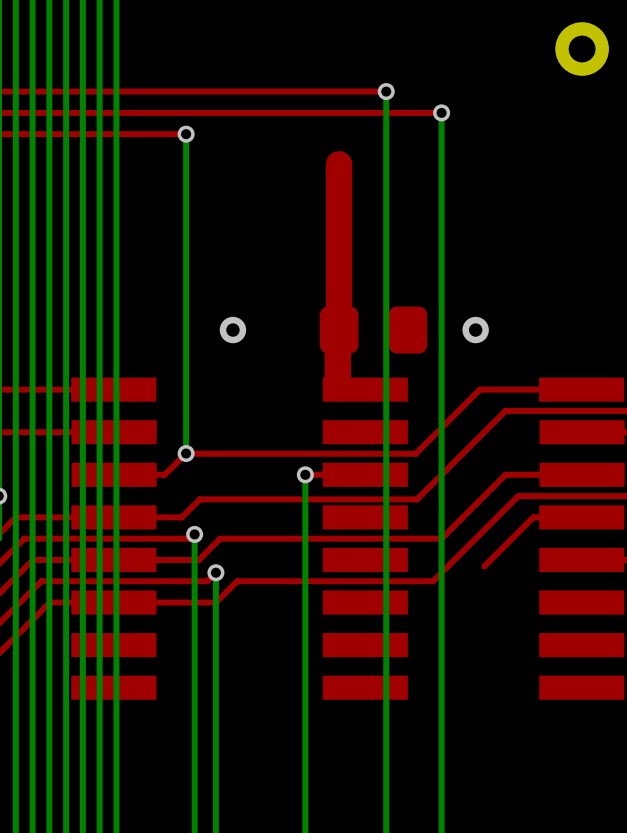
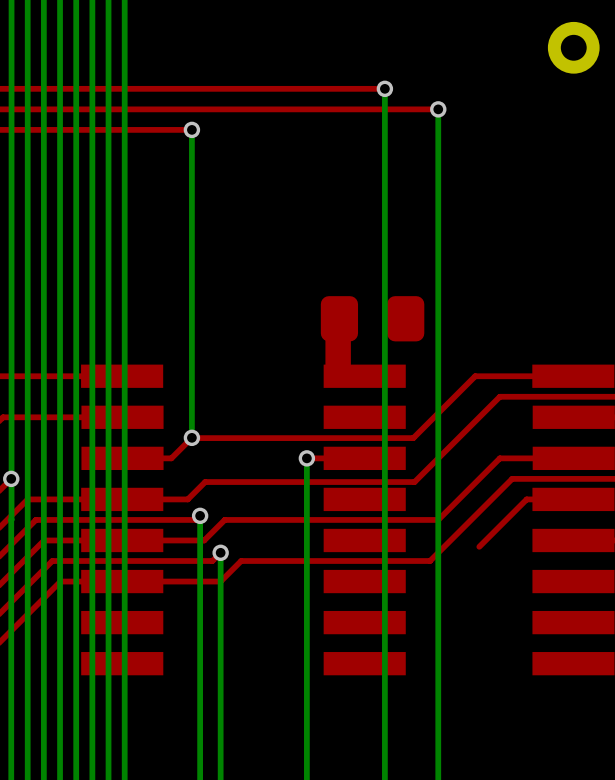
top track: (339, 164) (339, 330) -> none
via: (232, 330) -> none
via: (475, 330) -> none

